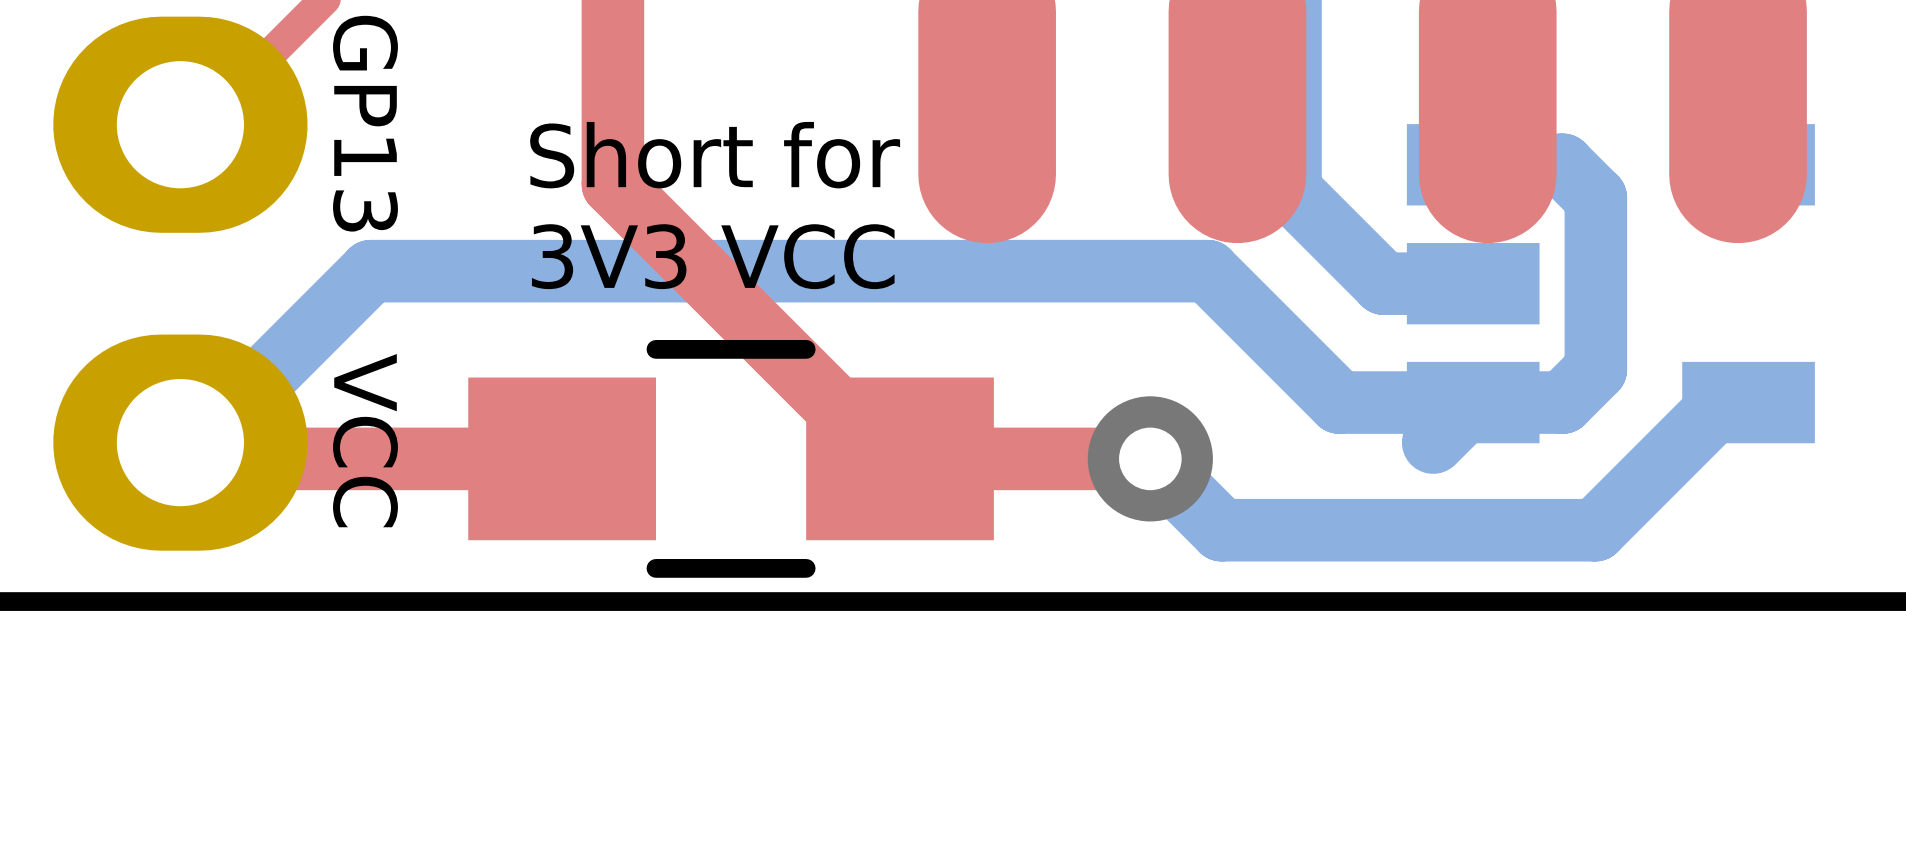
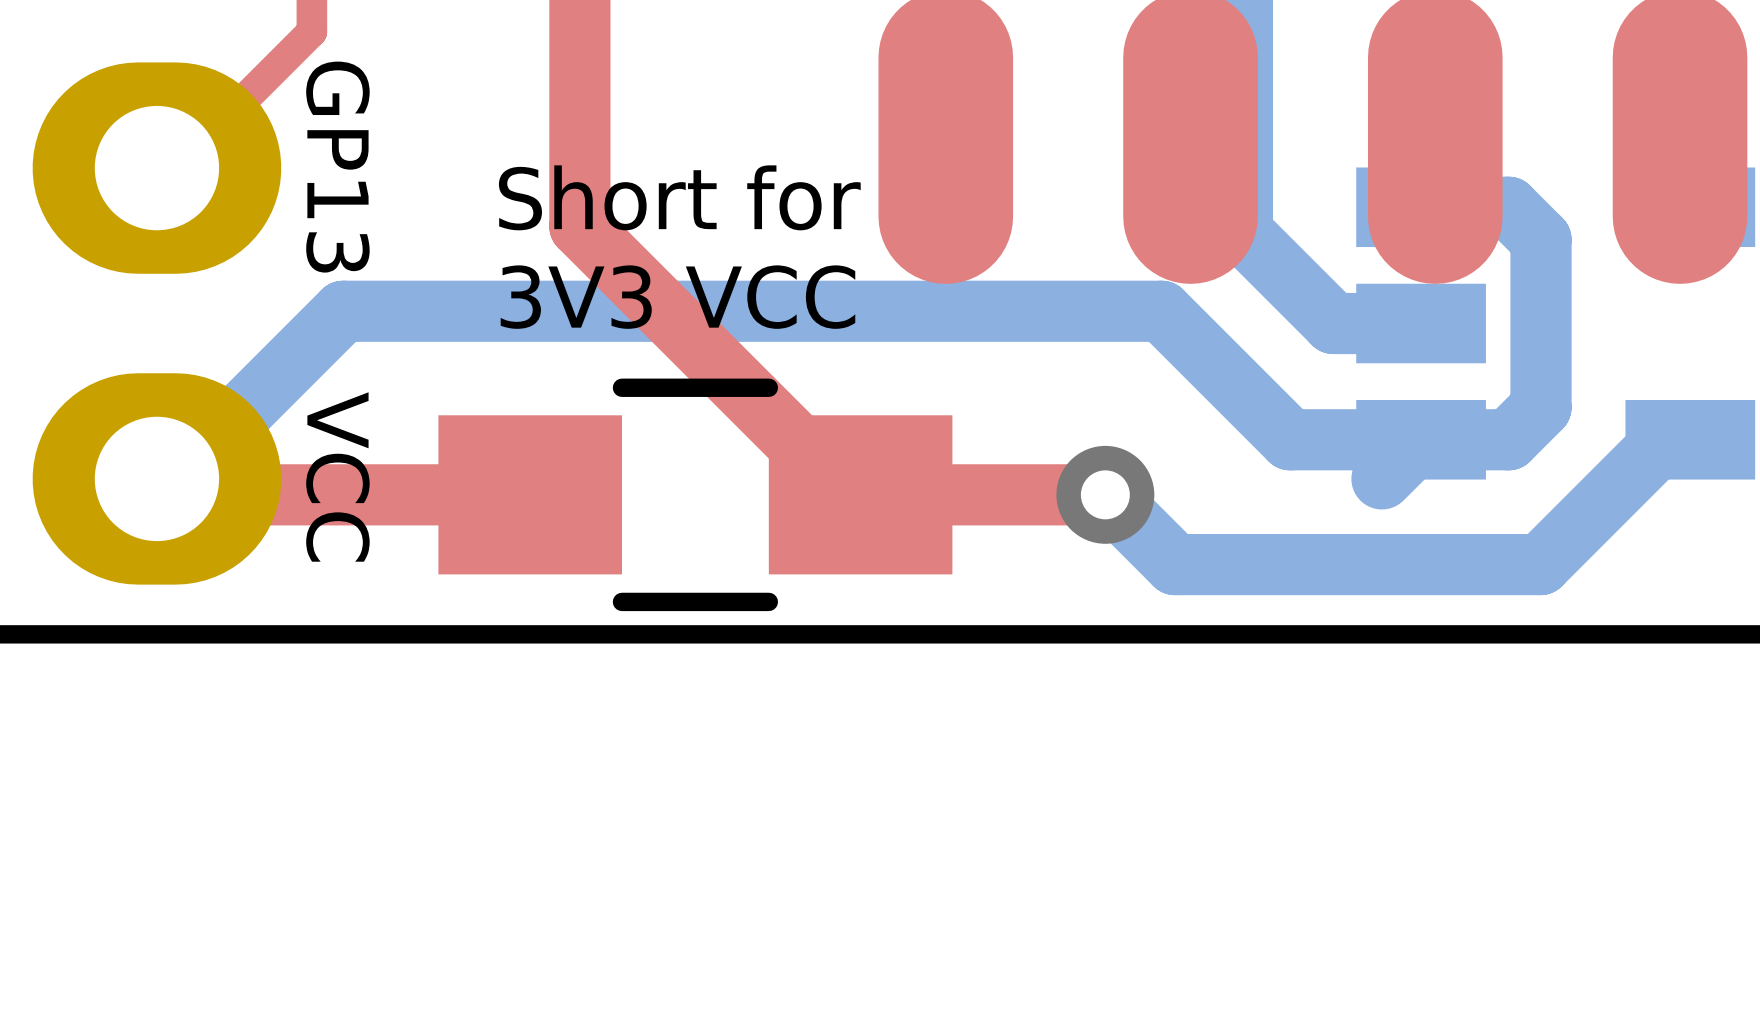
via size: [1087, 396, 1213, 522] -> [1056, 445, 1155, 544]

